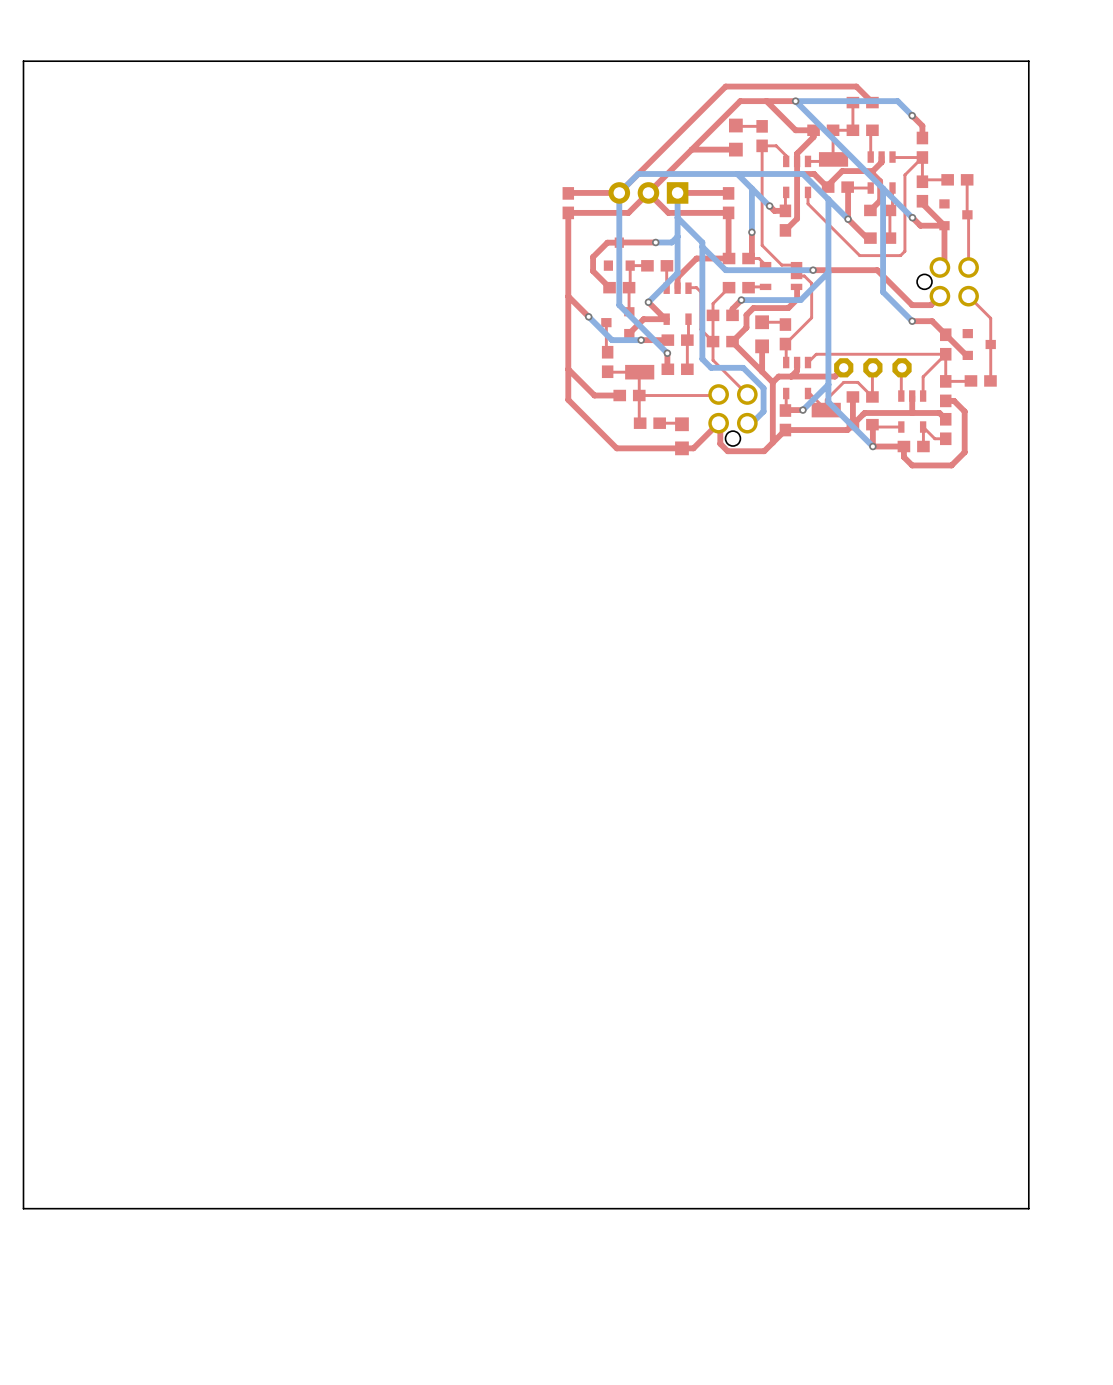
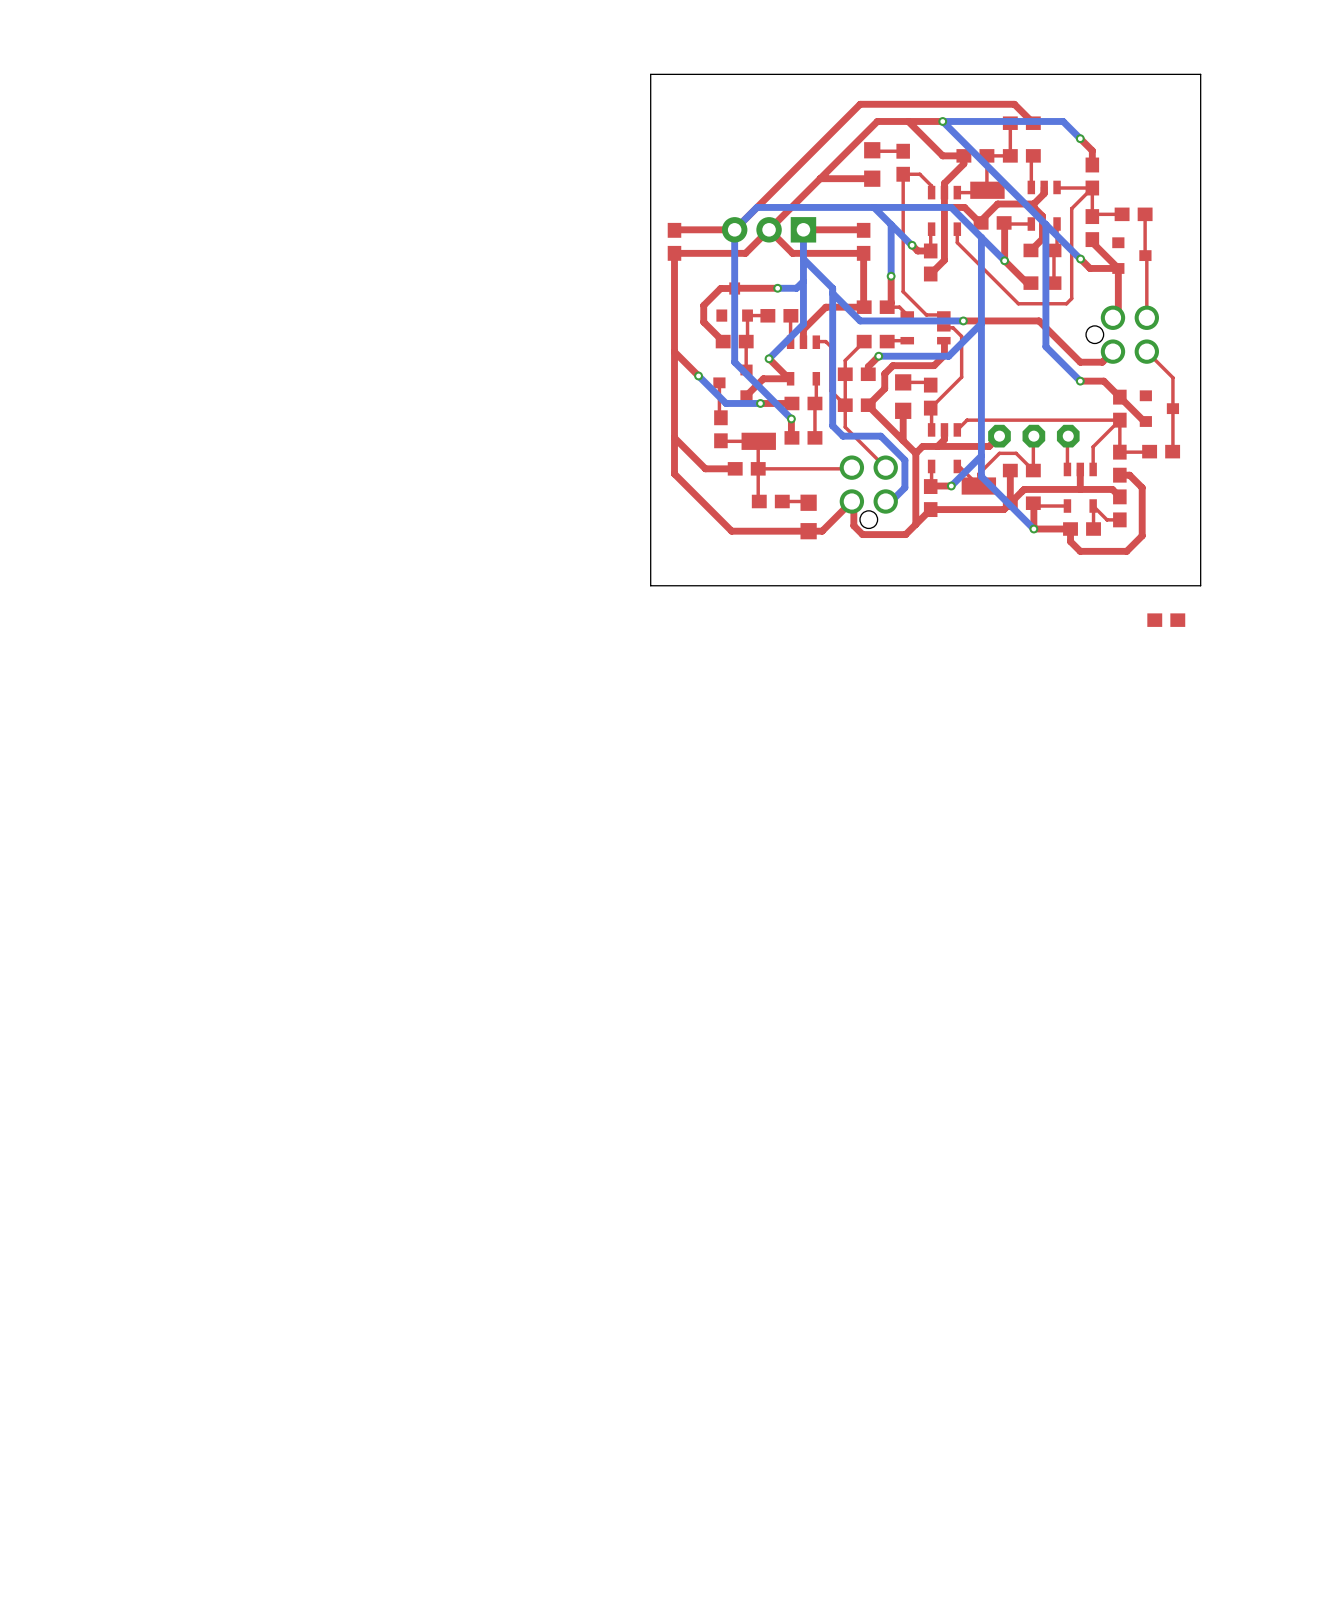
board edge: (1014, 61) (1028, 61) (1028, 1208) (23, 1208) (23, 61) (548, 61) -> (1200, 74) (1200, 585) (650, 585) (650, 74)
part: none -> (1166, 620)

